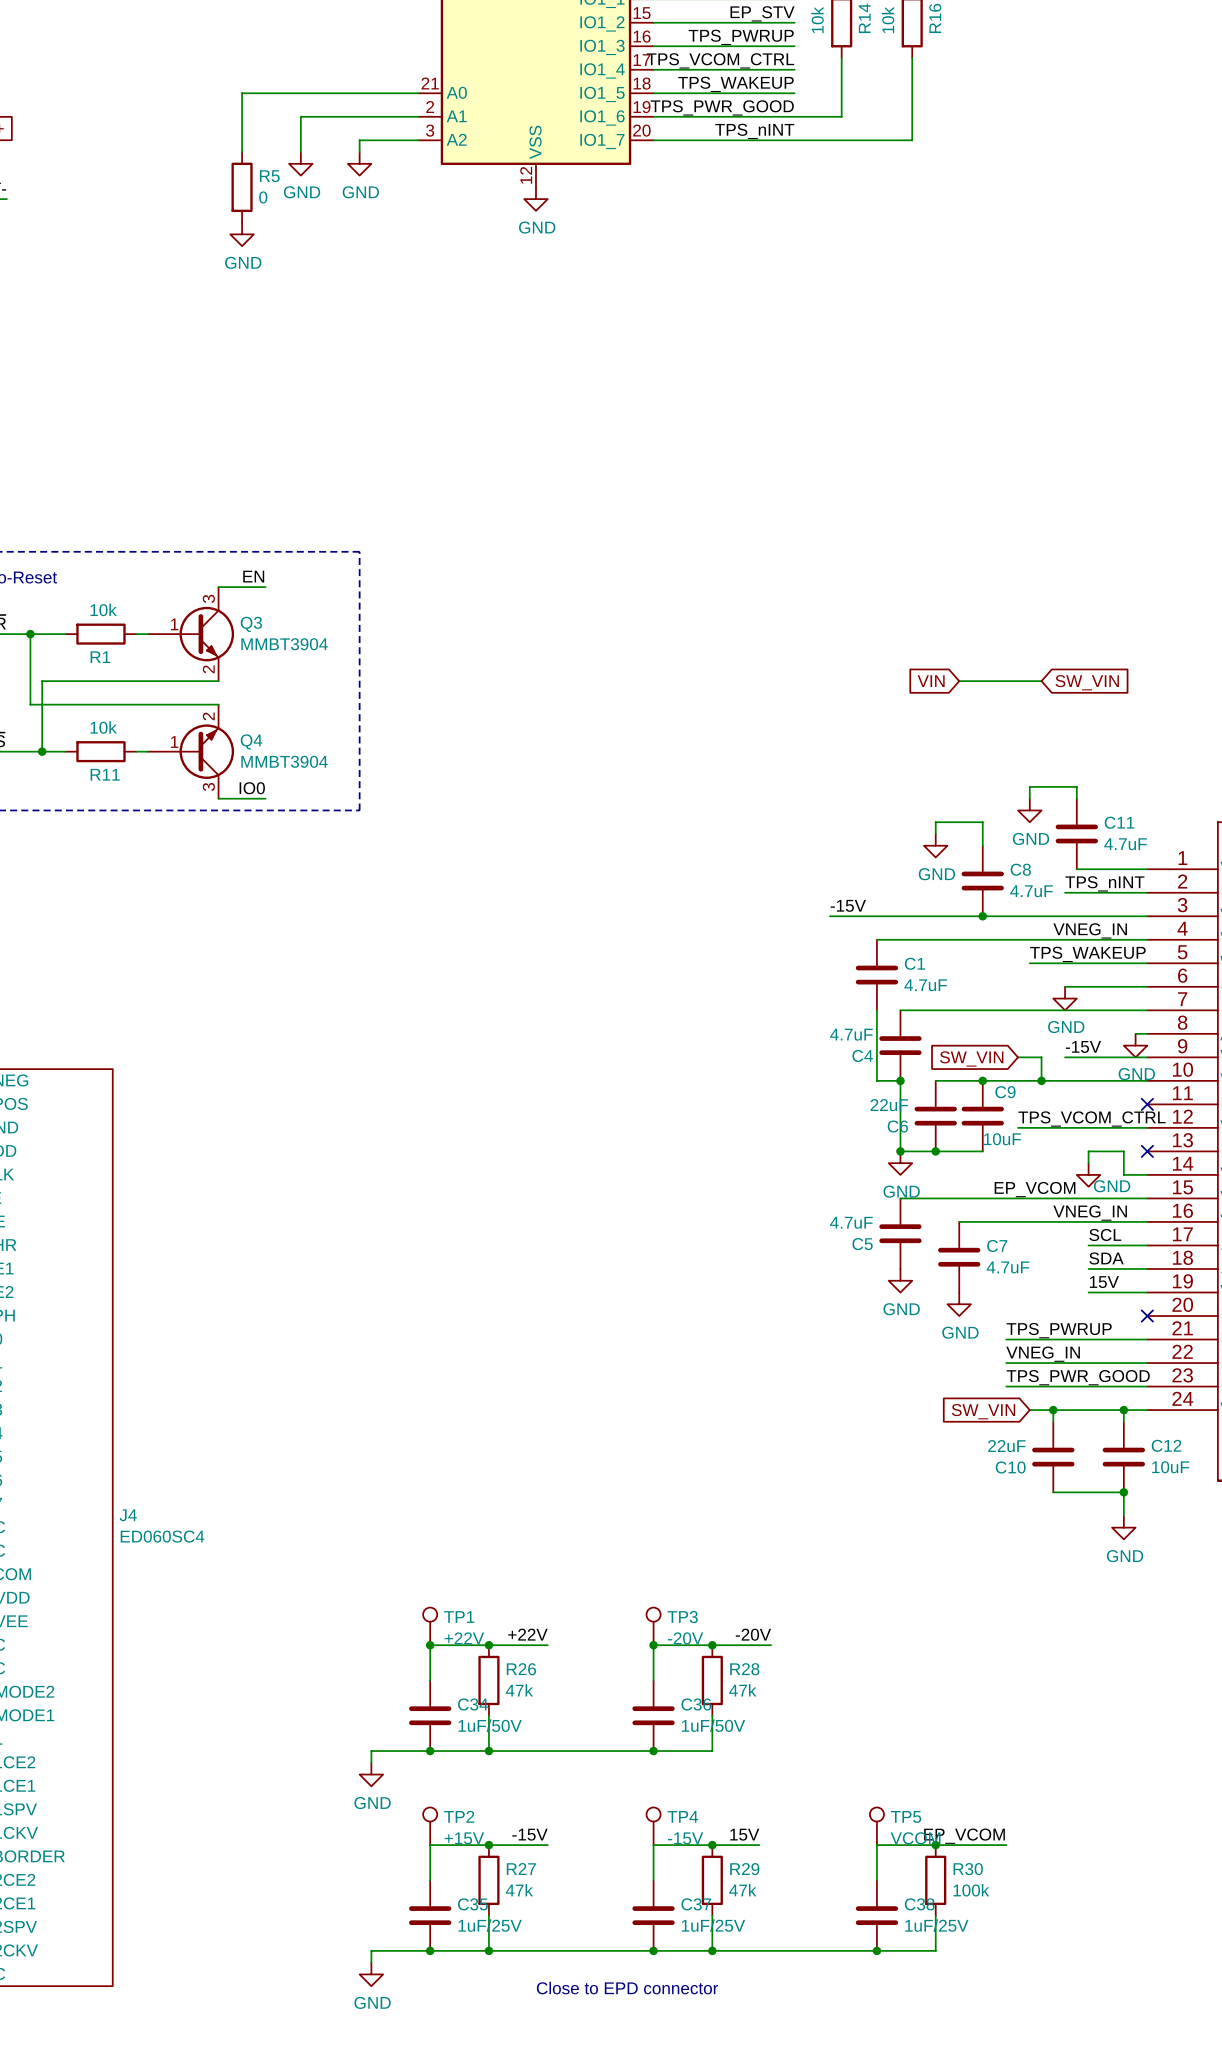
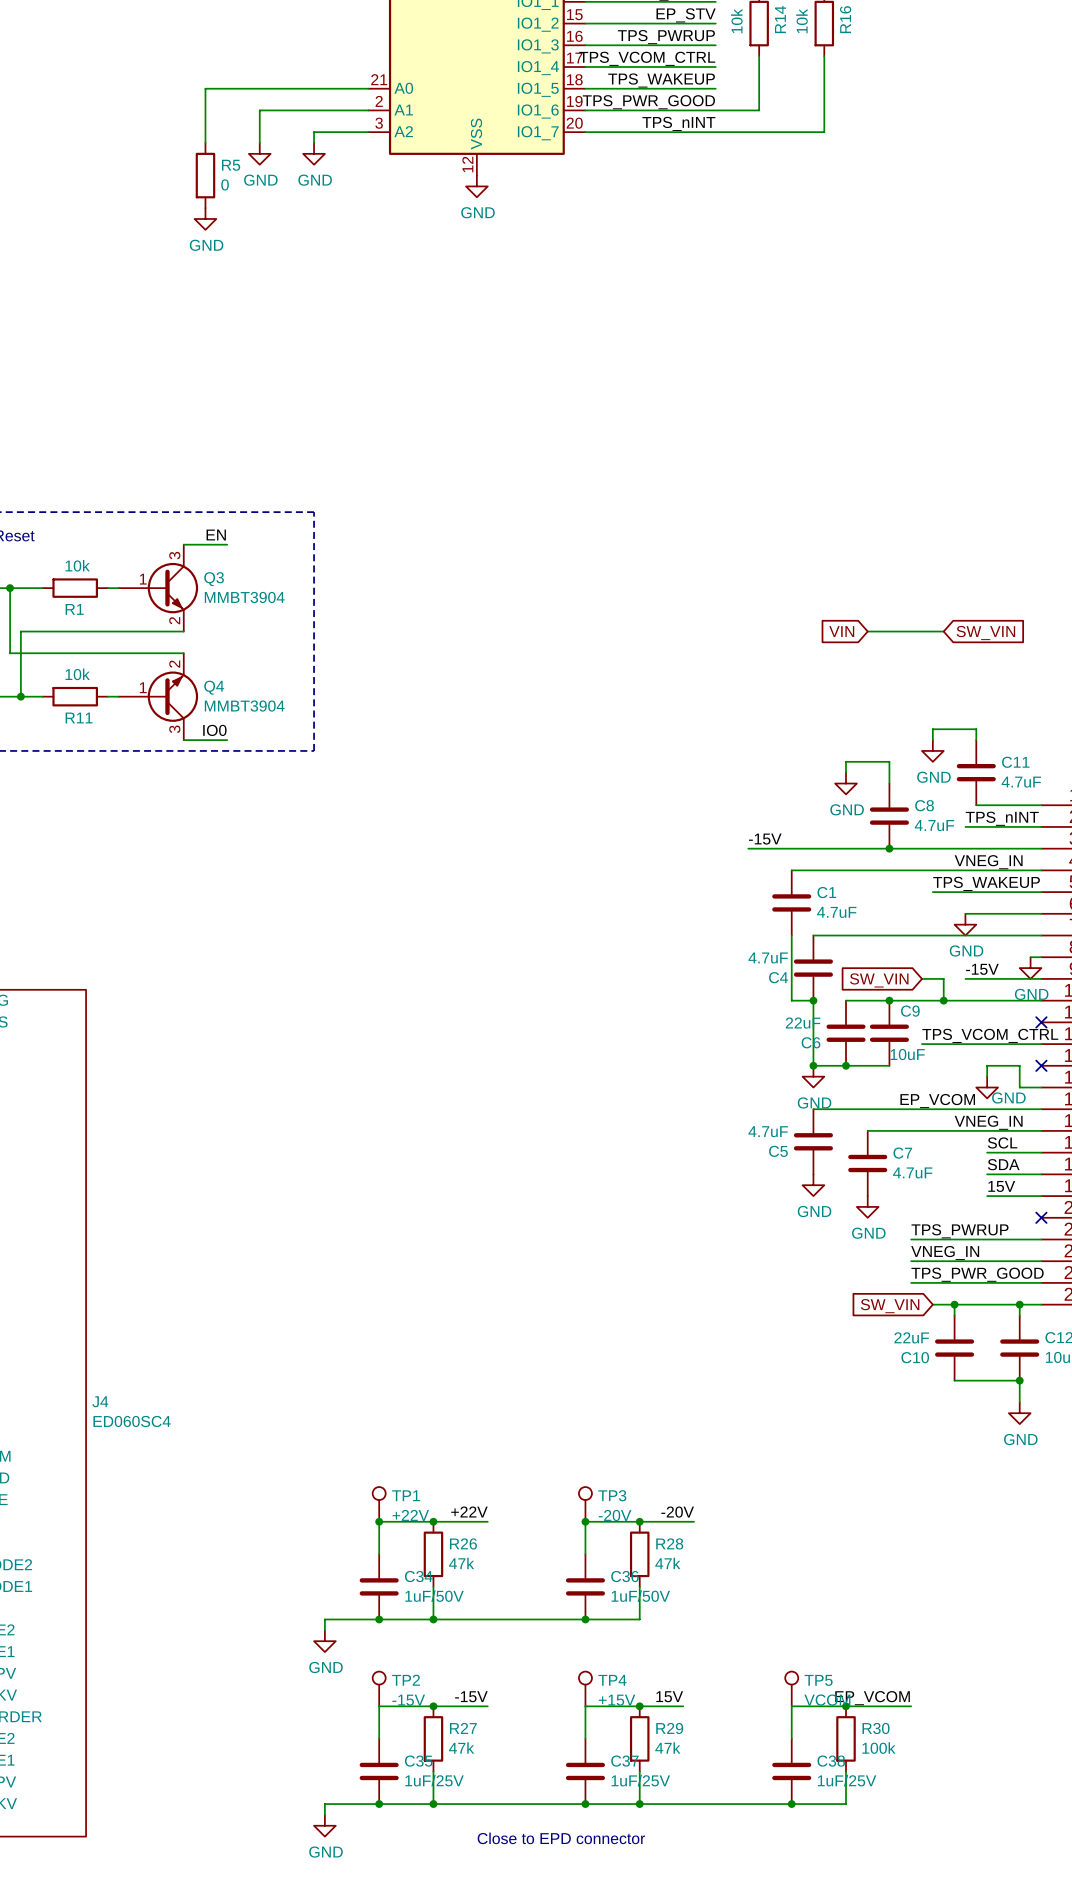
TP2 value: +15V (464, 1838) -> -15V (408, 1700)
TP4 value: -15V (685, 1838) -> +15V (617, 1700)

